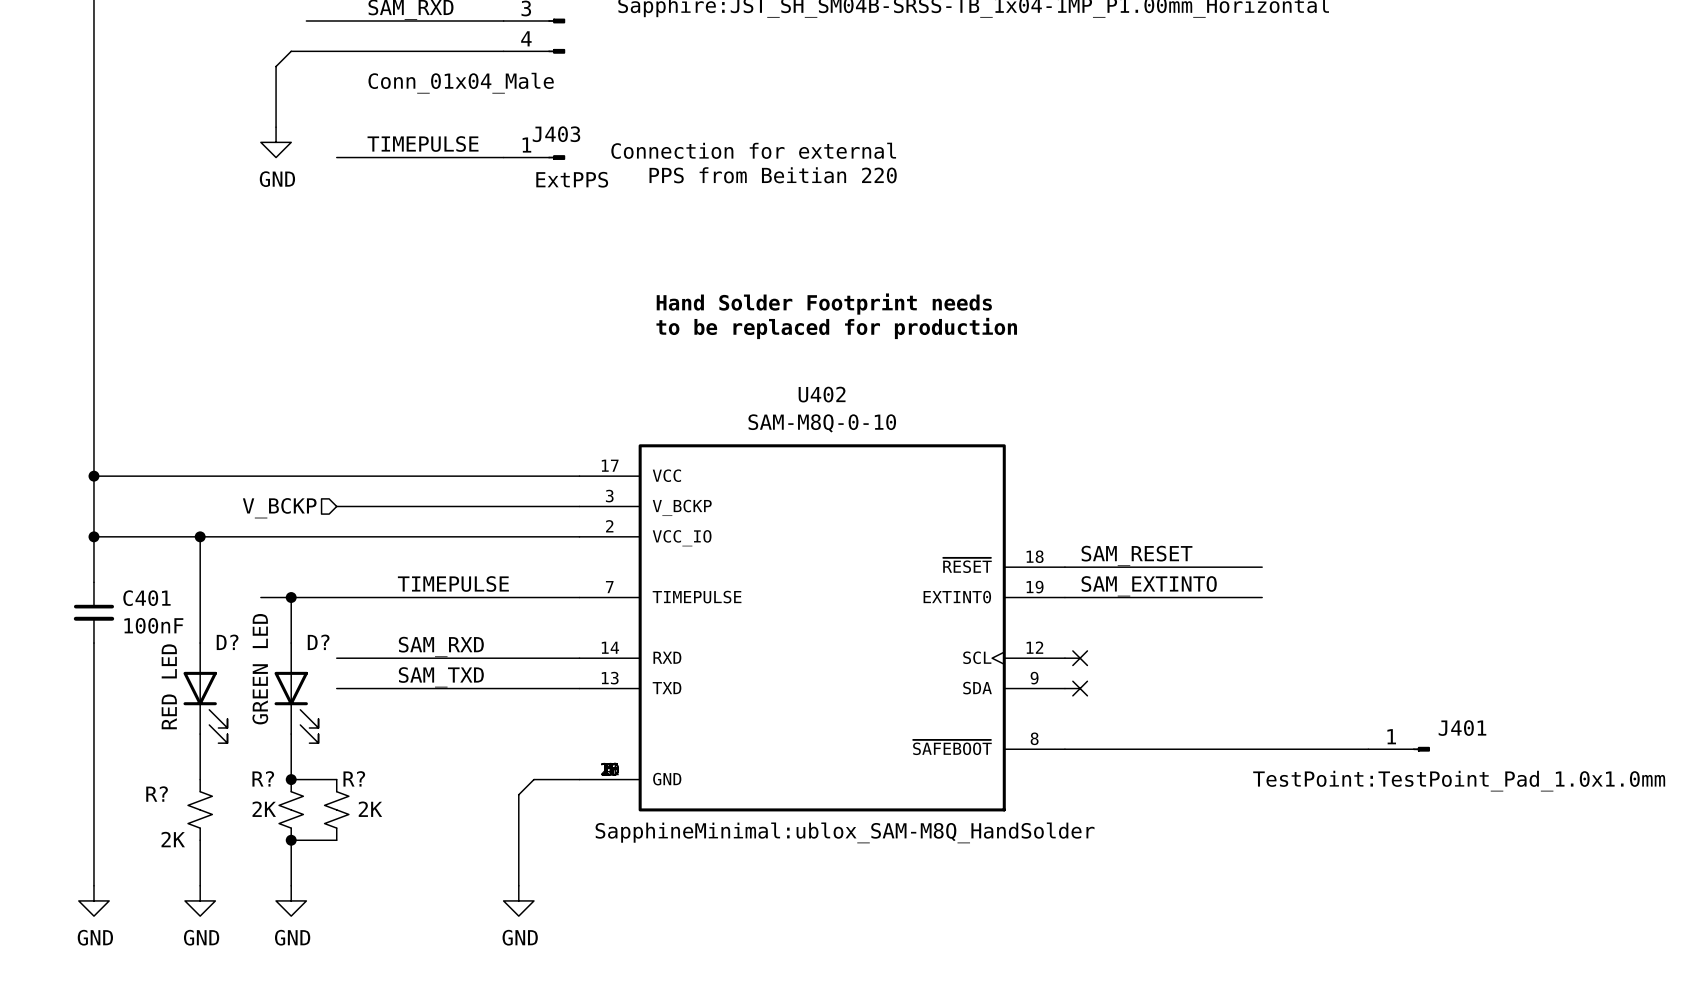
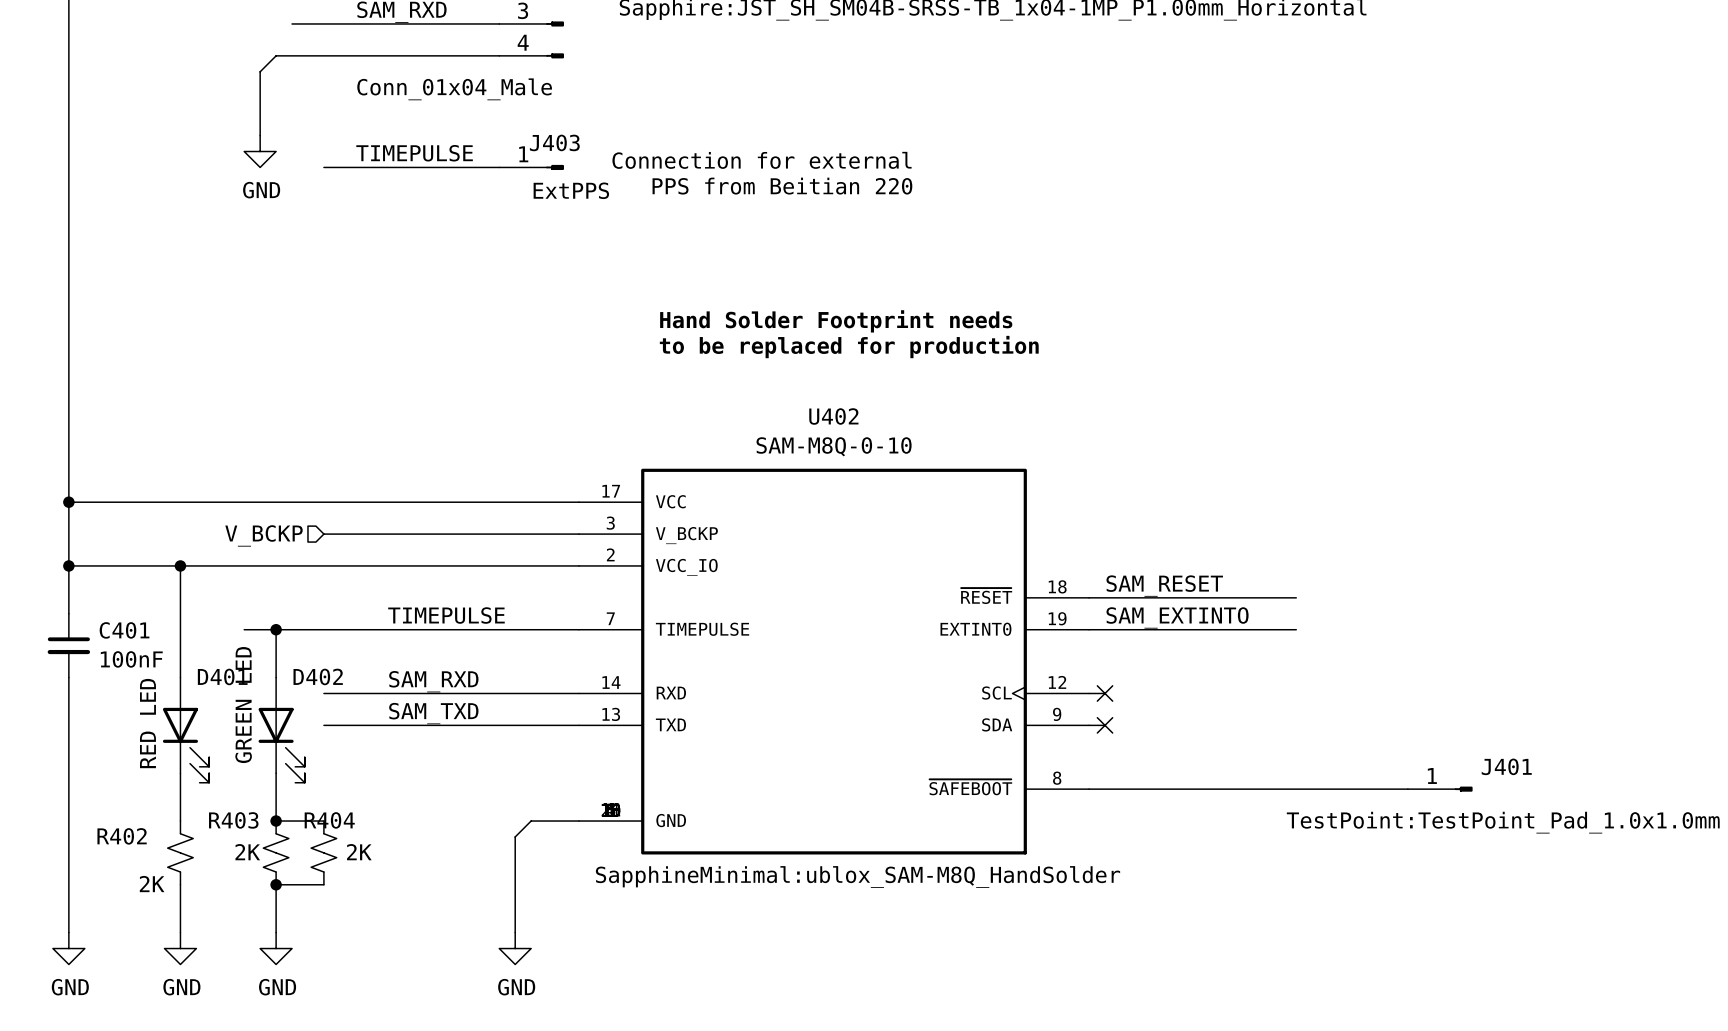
D? name: D? (227, 642) -> D401 (222, 676)
D? name: D? (318, 642) -> D402 (318, 676)
R? name: R? (263, 778) -> R403 (233, 820)
R? name: R? (354, 778) -> R404 (329, 820)
R? name: R? (157, 794) -> R402 (122, 836)

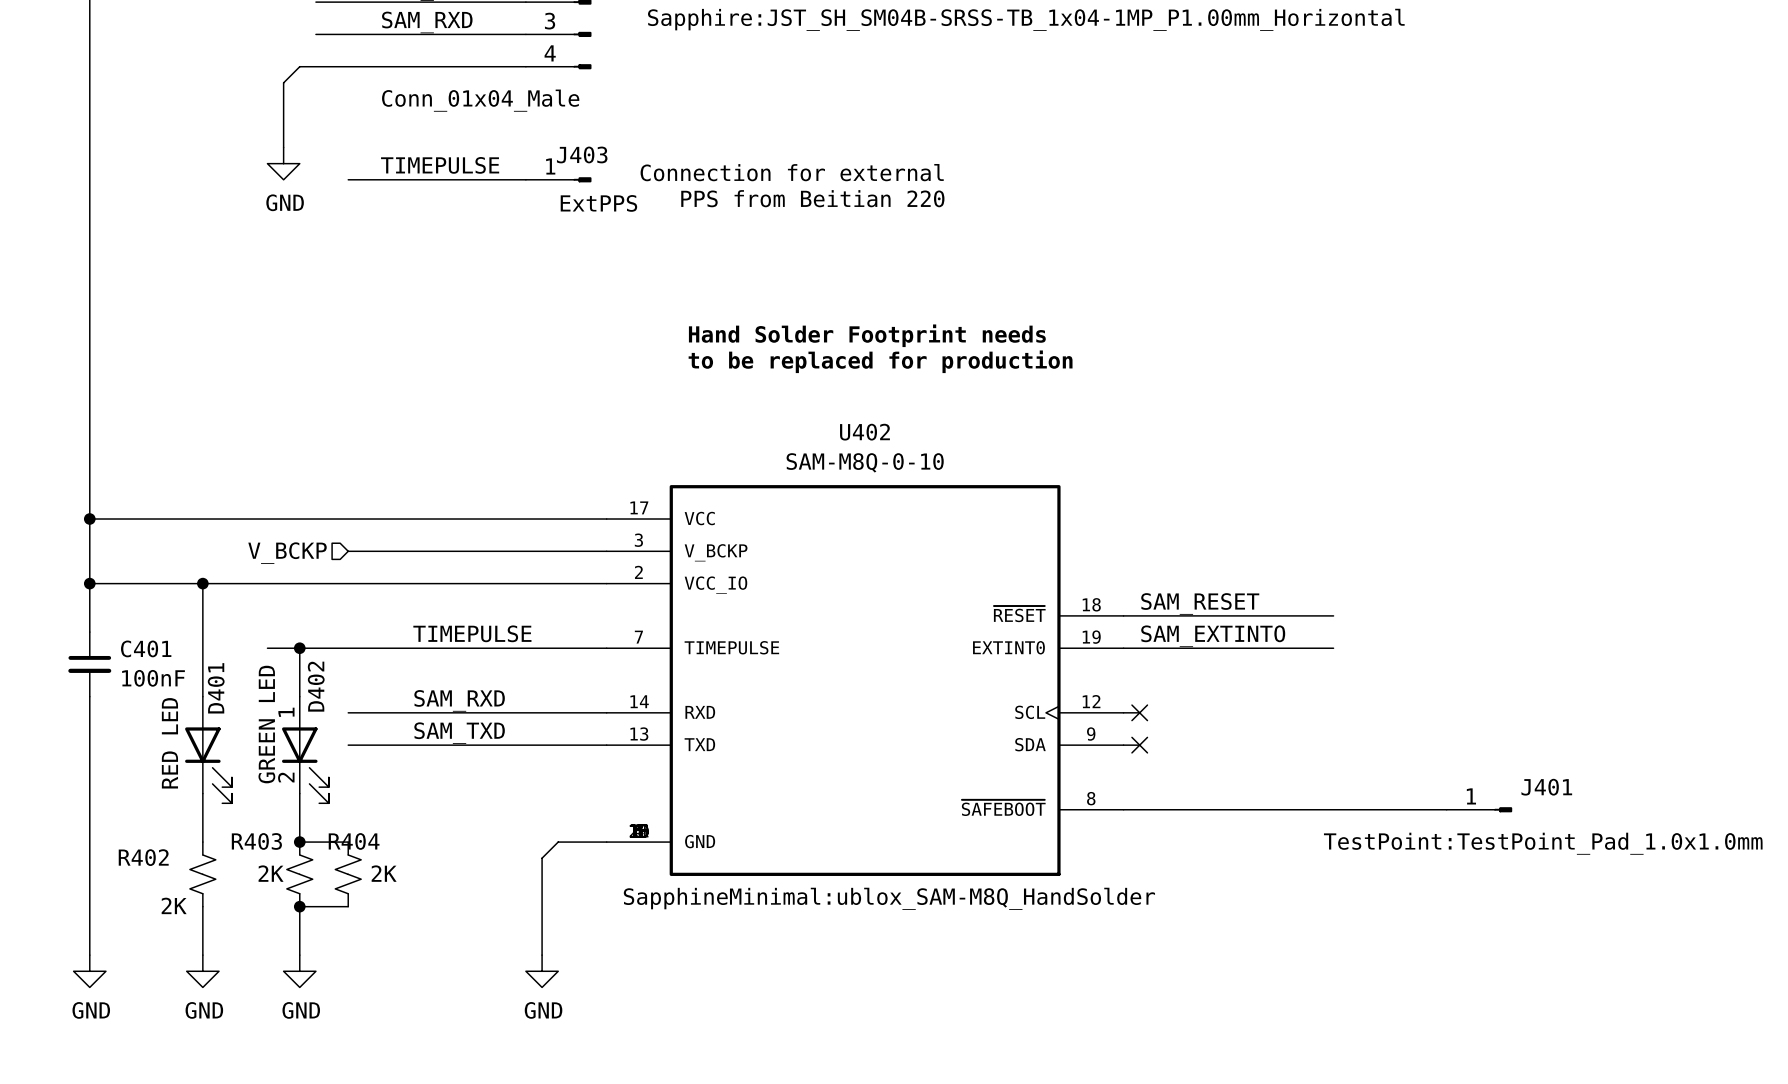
D401 name rotation: 0° (222, 676) -> 90° counterclockwise (216, 688)
D402 name rotation: 0° (318, 676) -> 90° counterclockwise (316, 686)
D402 pin number: none -> 1 (286, 712)
D402 pin number: none -> 2 (286, 777)

